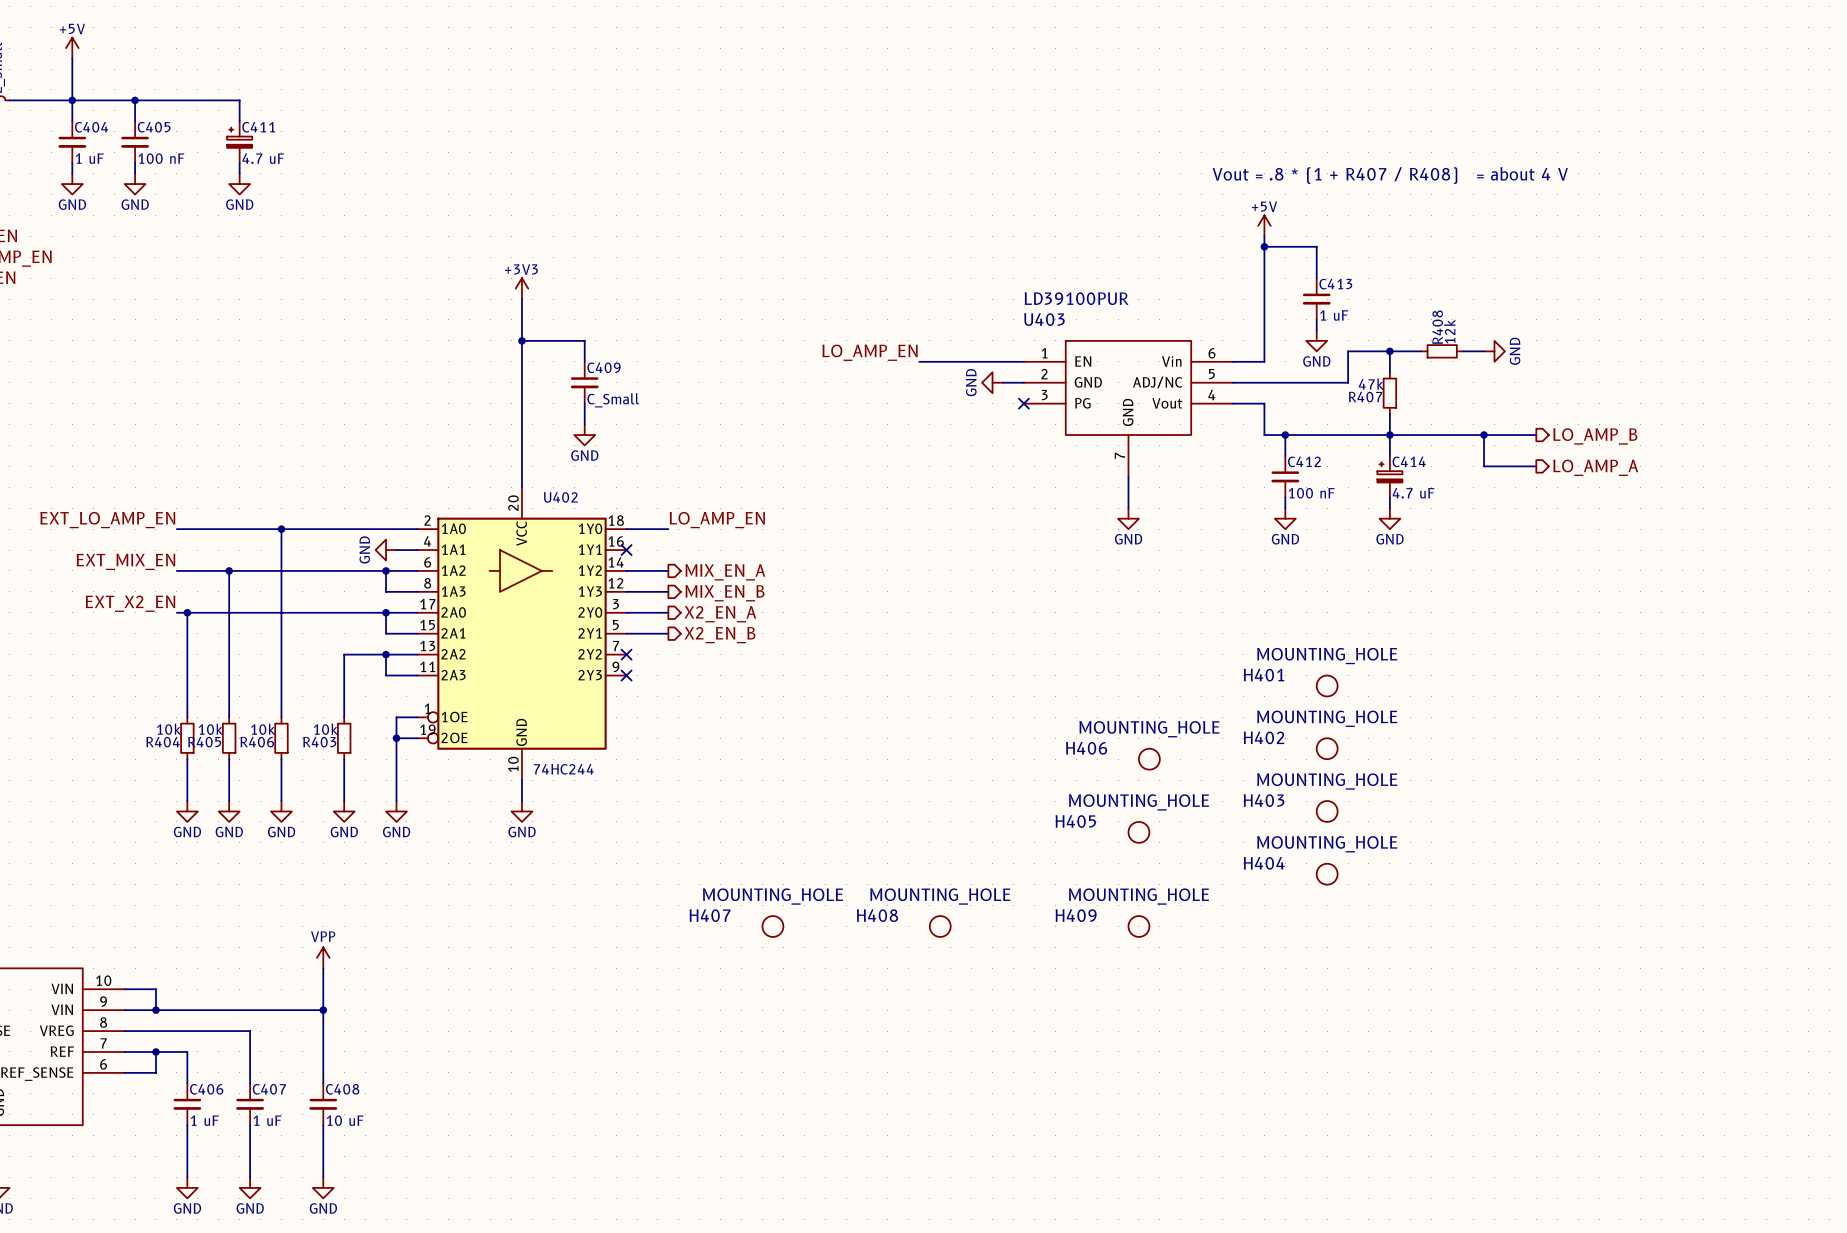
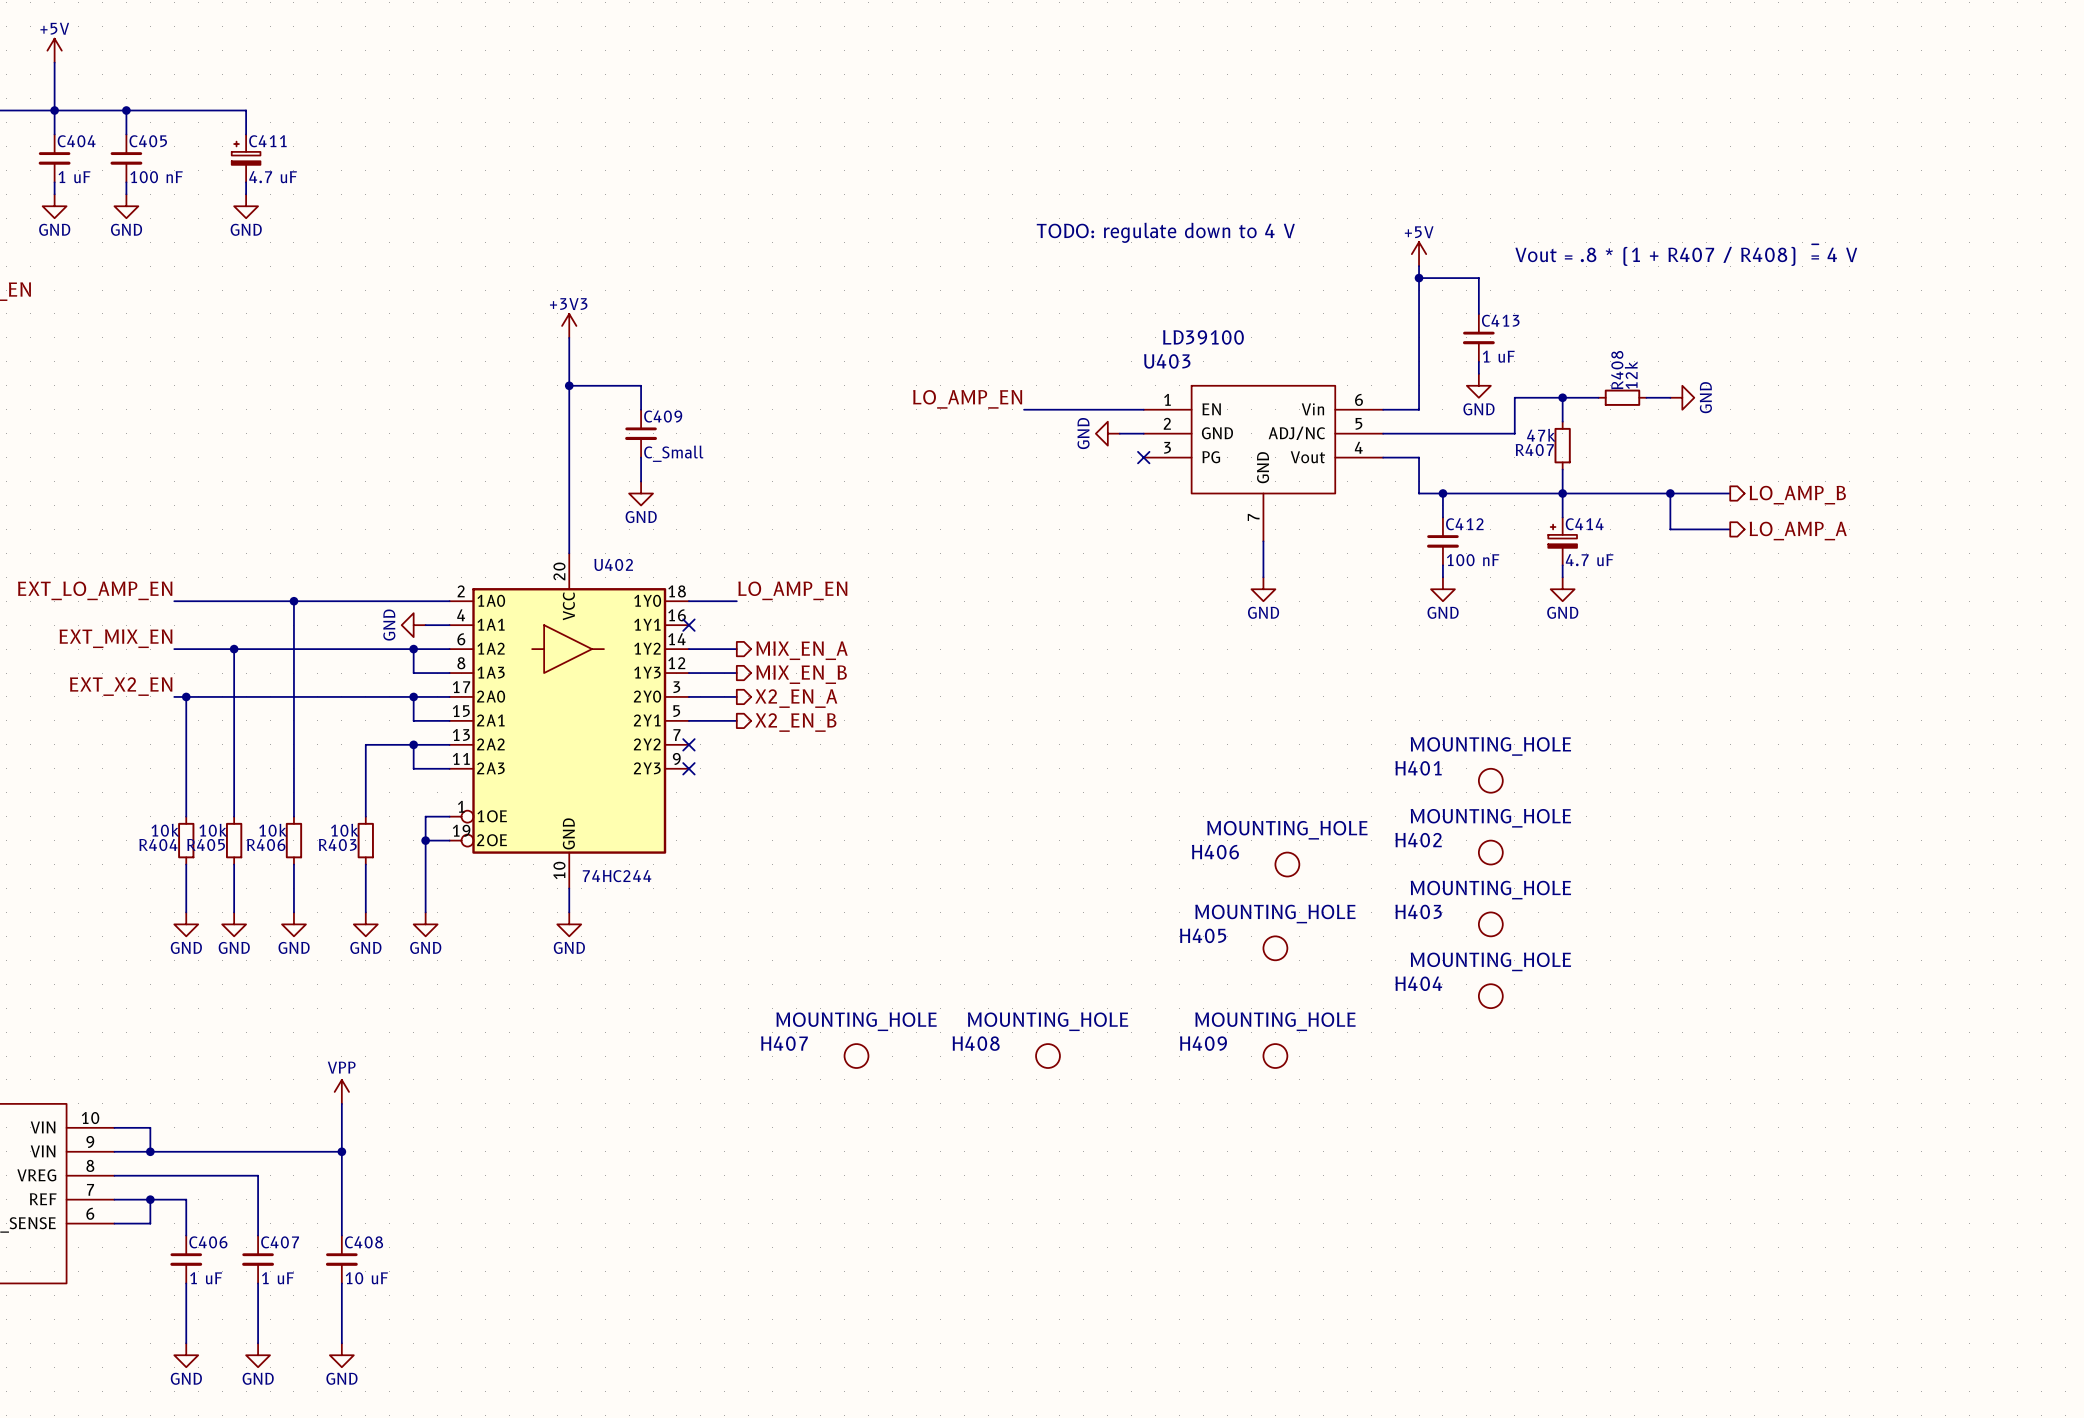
text: Vout = .8 * (1 + R407 / R408) = about 4 V (1390, 175) -> none
text: none -> TODO: regulate down to 4 V (1165, 232)
text: none -> Vout = .8 * (1 + R407 / R408) ~{=} 4 V (1686, 255)
U403 value: LD39100PUR (1076, 298) -> LD39100 (1203, 337)

